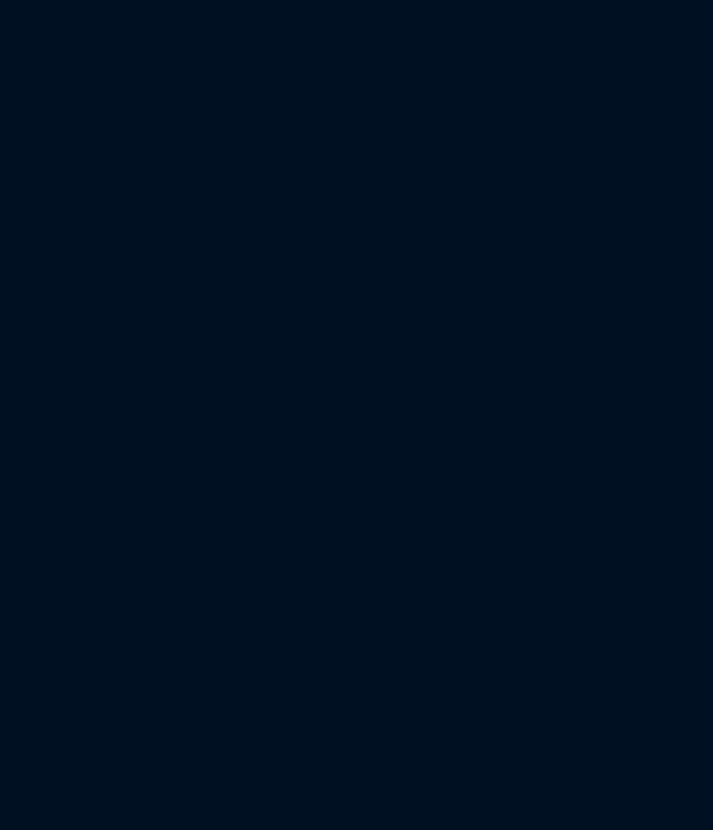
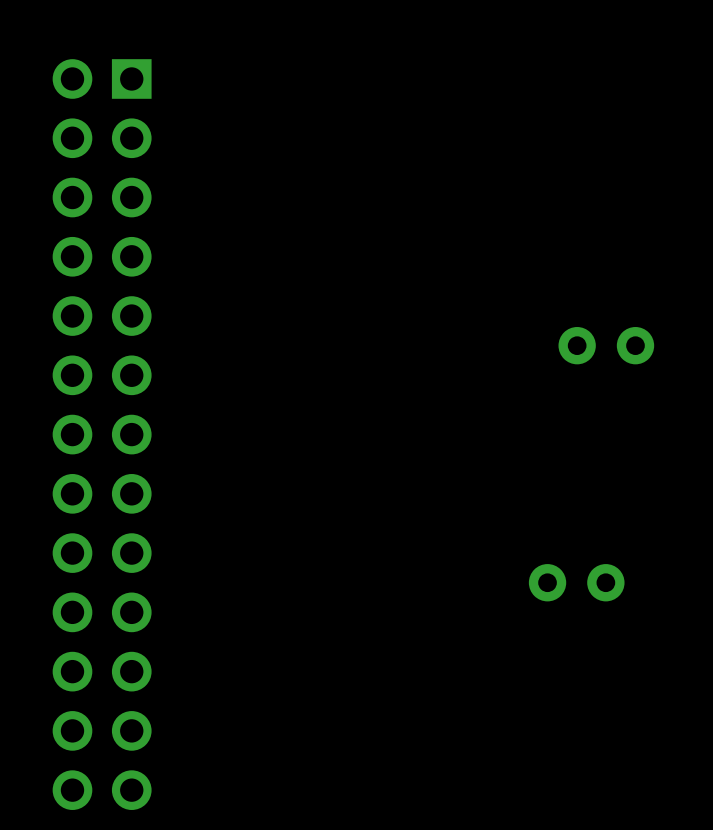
part: none -> (606, 345)
part: none -> (102, 434)
part: none -> (576, 582)

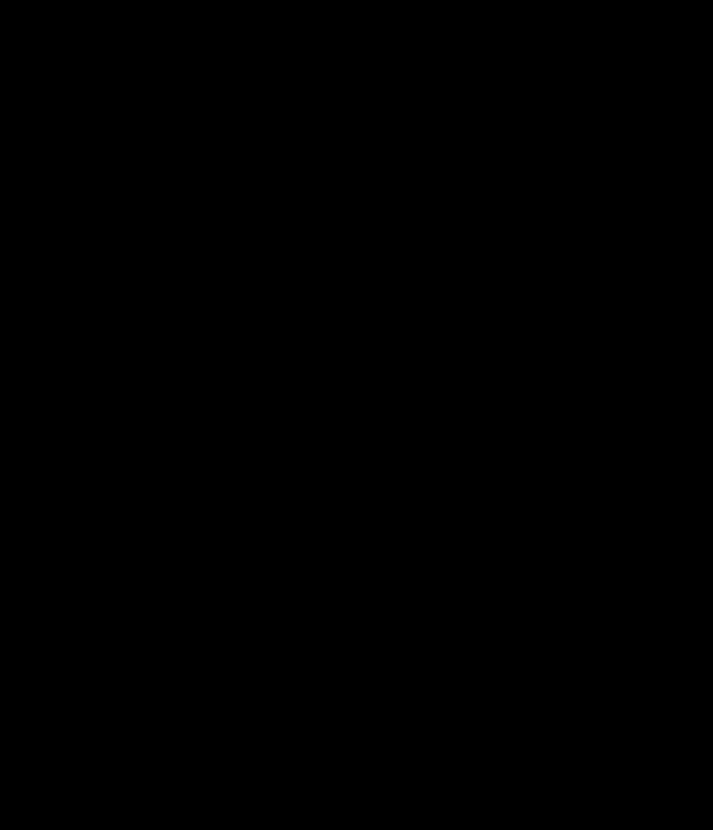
part: (606, 345) -> none
part: (102, 434) -> none
part: (576, 582) -> none

